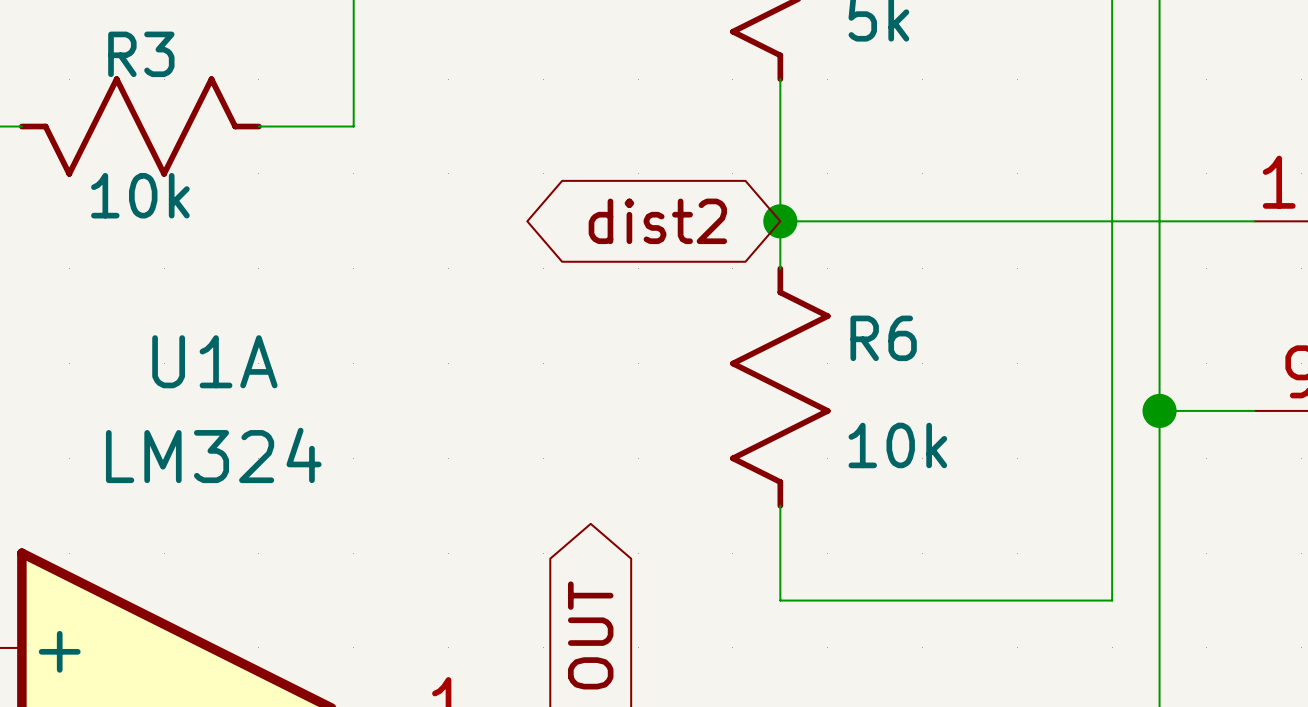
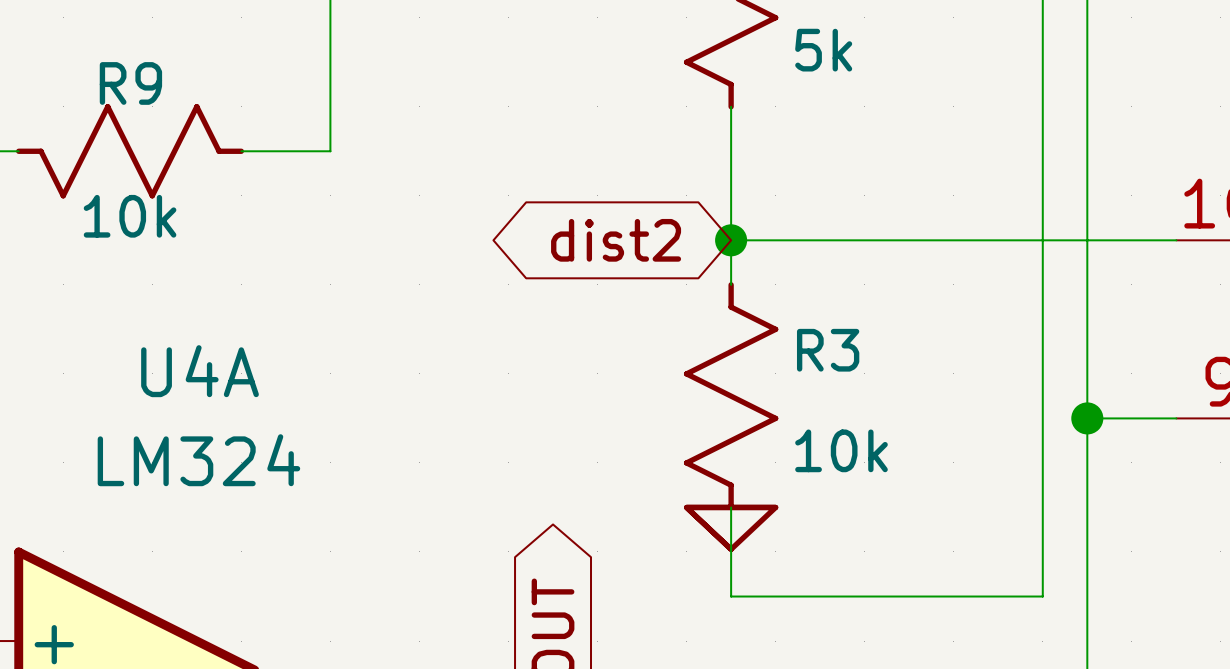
R3 name: R3 (141, 54) -> R9 (130, 83)
R6 name: R6 (883, 338) -> R3 (828, 350)
U1A name: U1A (214, 361) -> U4A (200, 371)
power symbol: none -> (731, 528)

